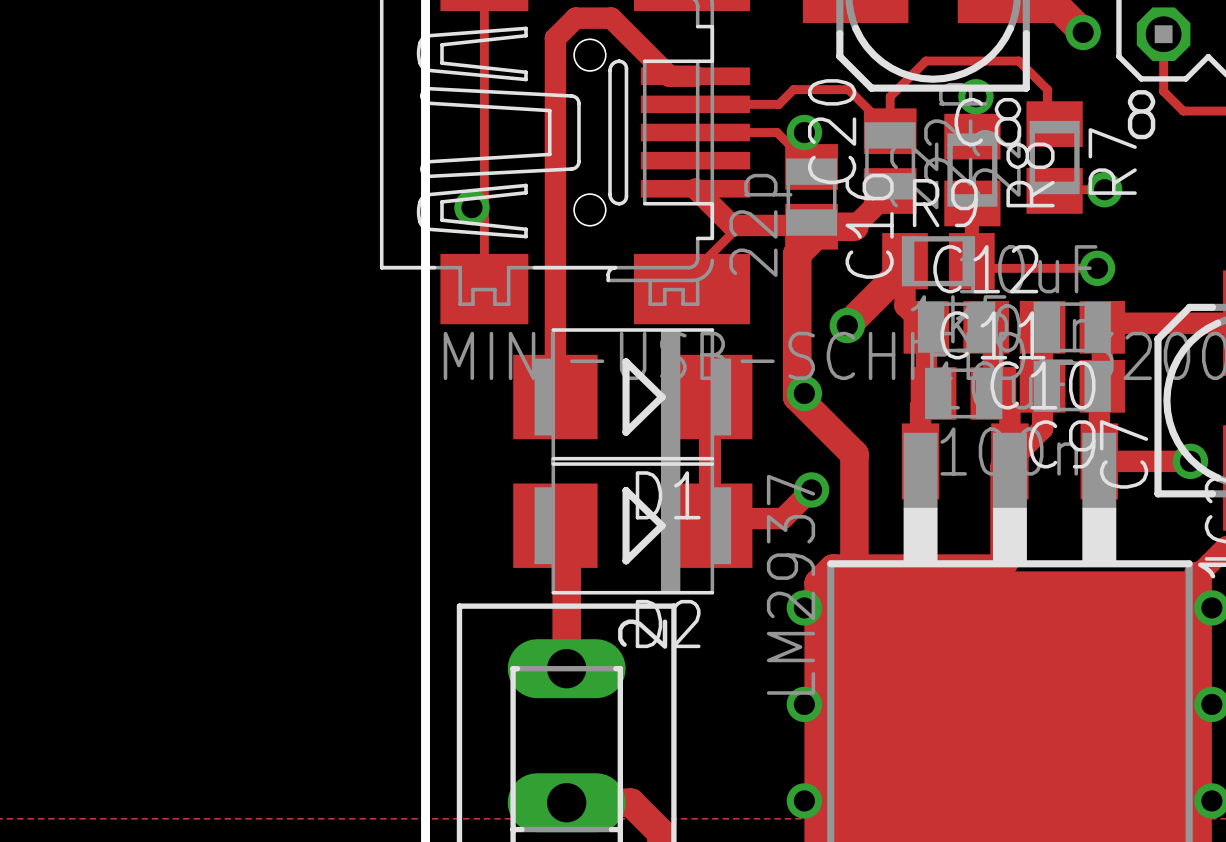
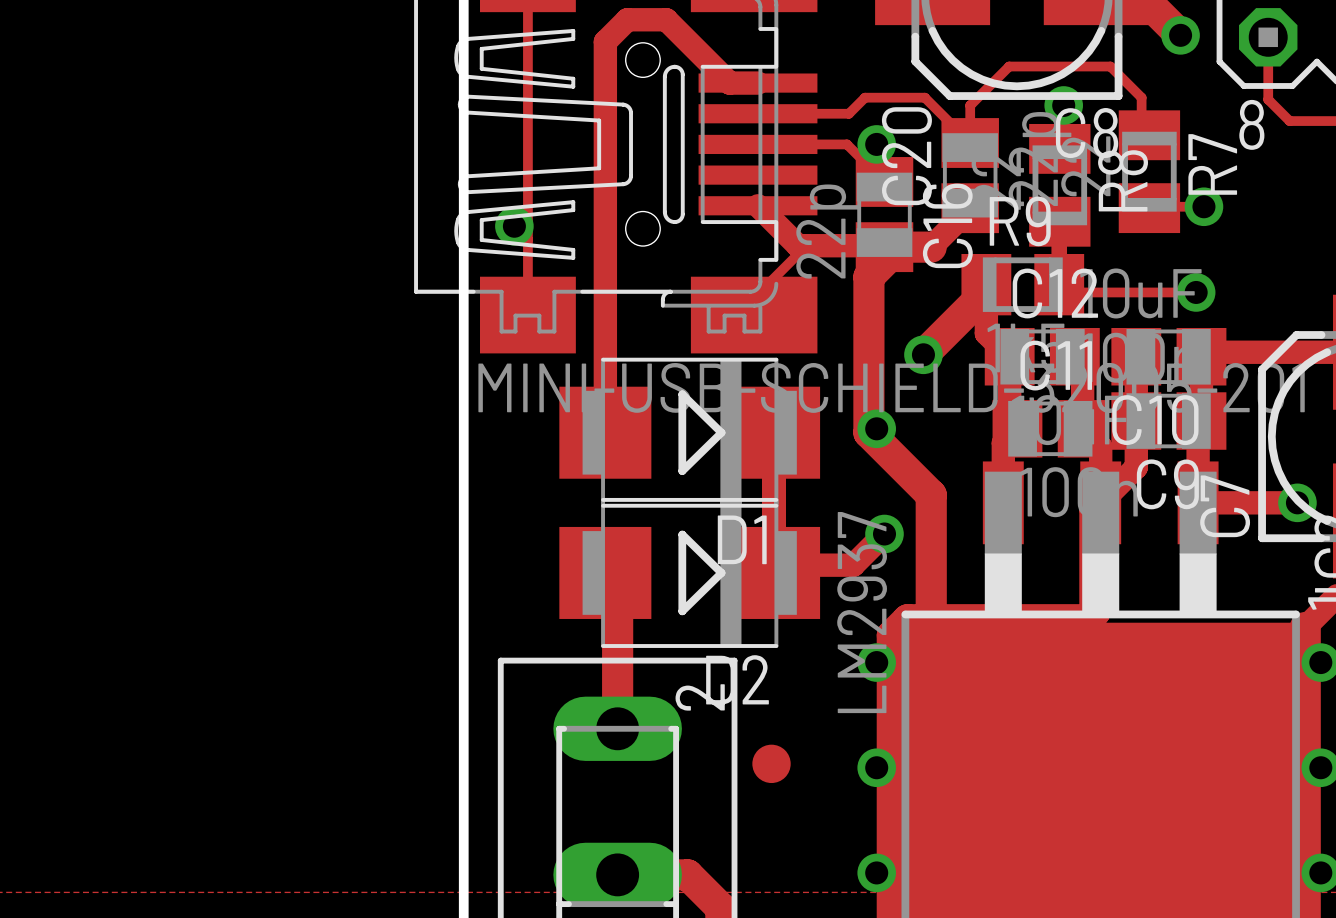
part: none -> (771, 763)

